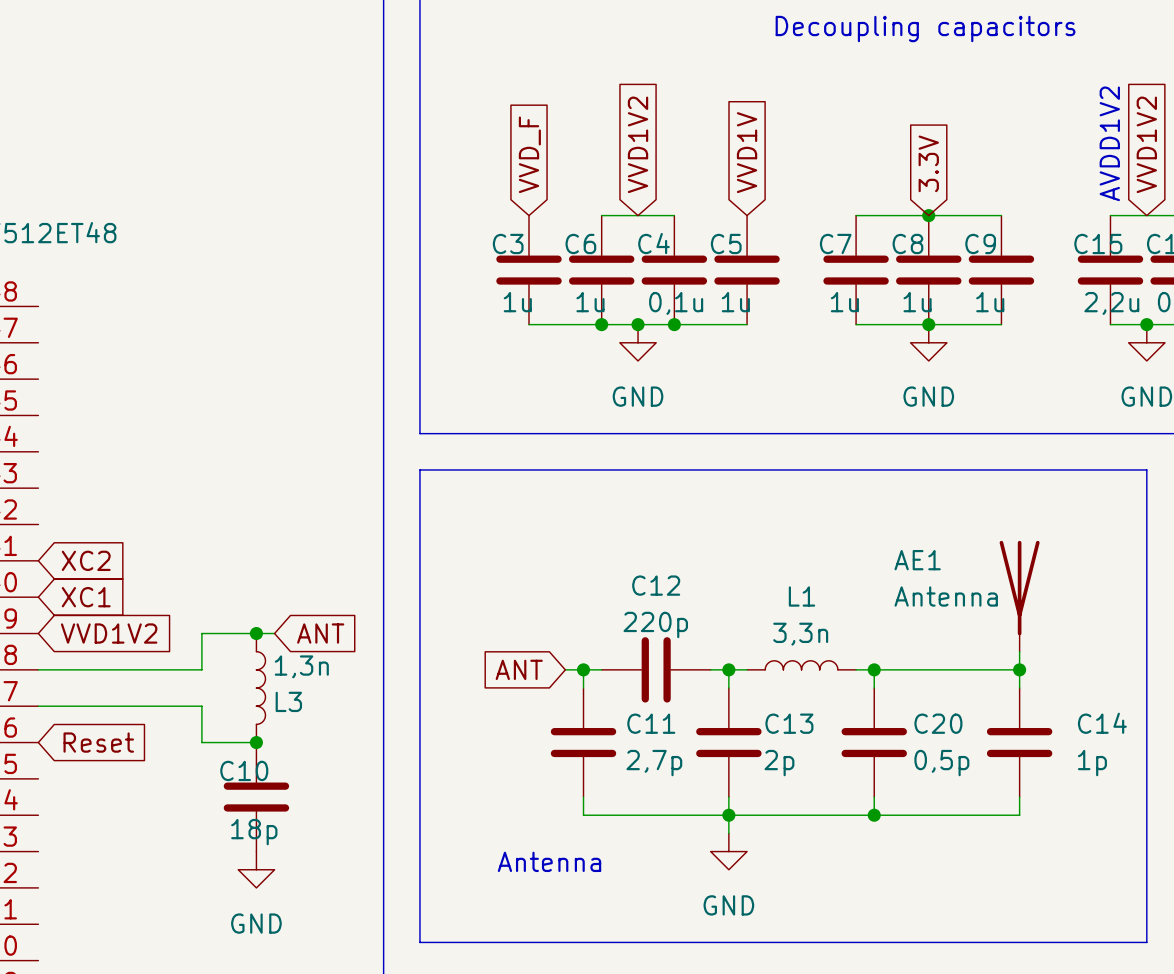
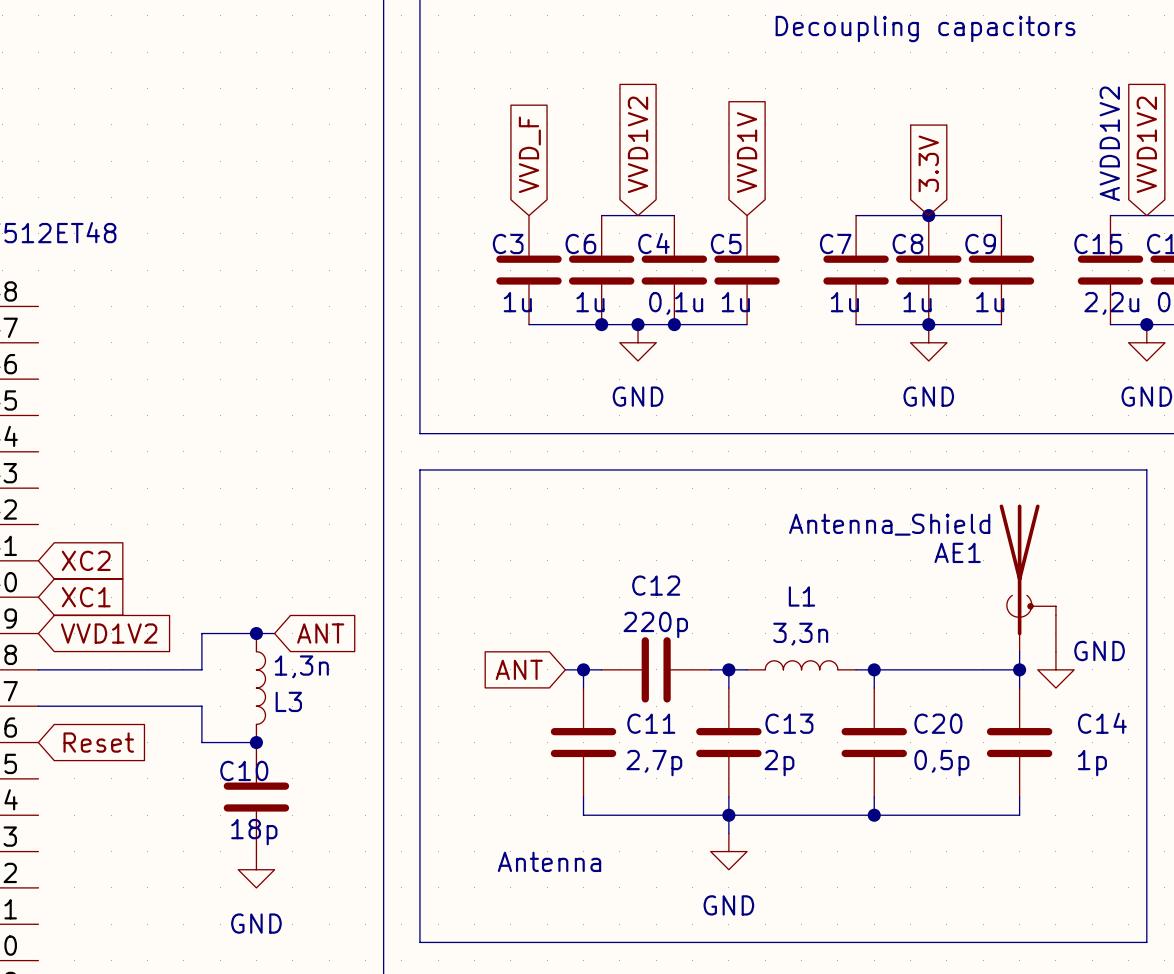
AE1 symbol: [999, 540, 1040, 652] -> [999, 504, 1056, 652]
AE1 name position: AE1 (917, 560) -> AE1 (957, 552)
AE1 value: Antenna (946, 596) -> Antenna_Shield (889, 524)
power symbol: none -> GND (1055, 669)

